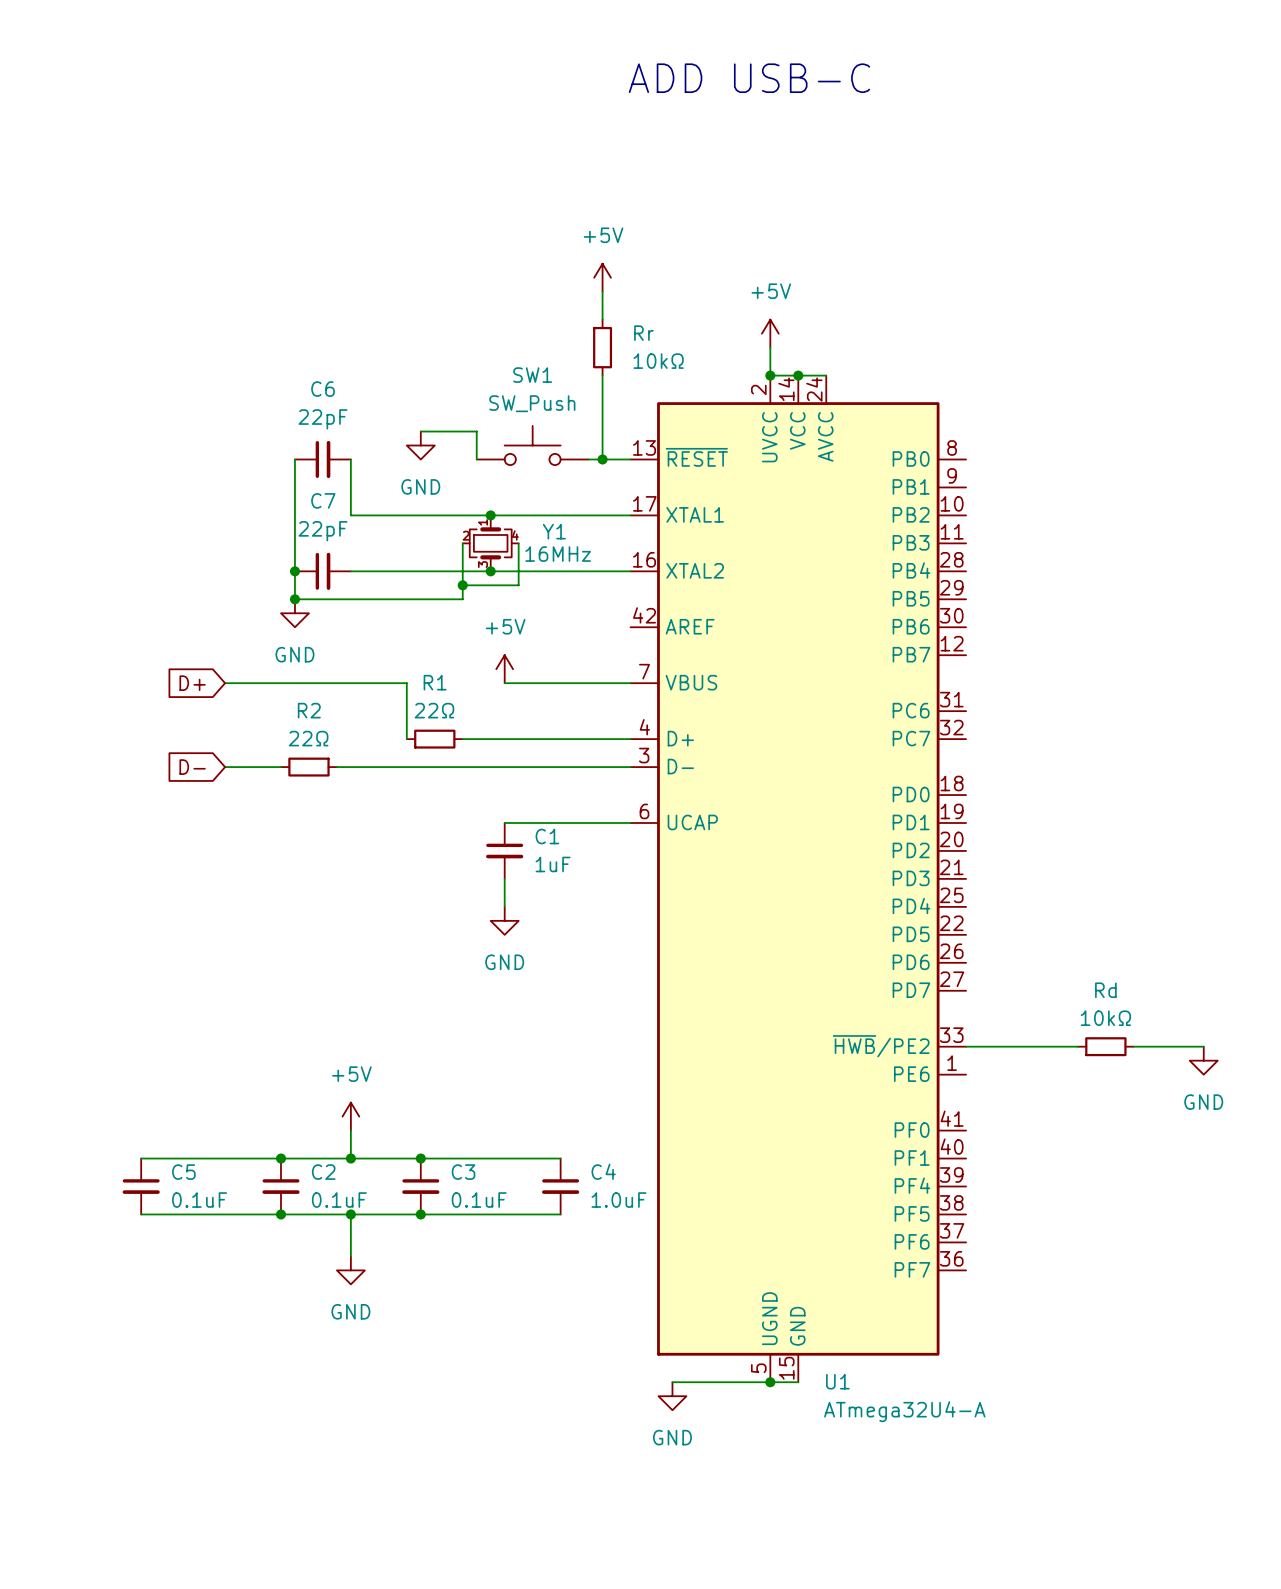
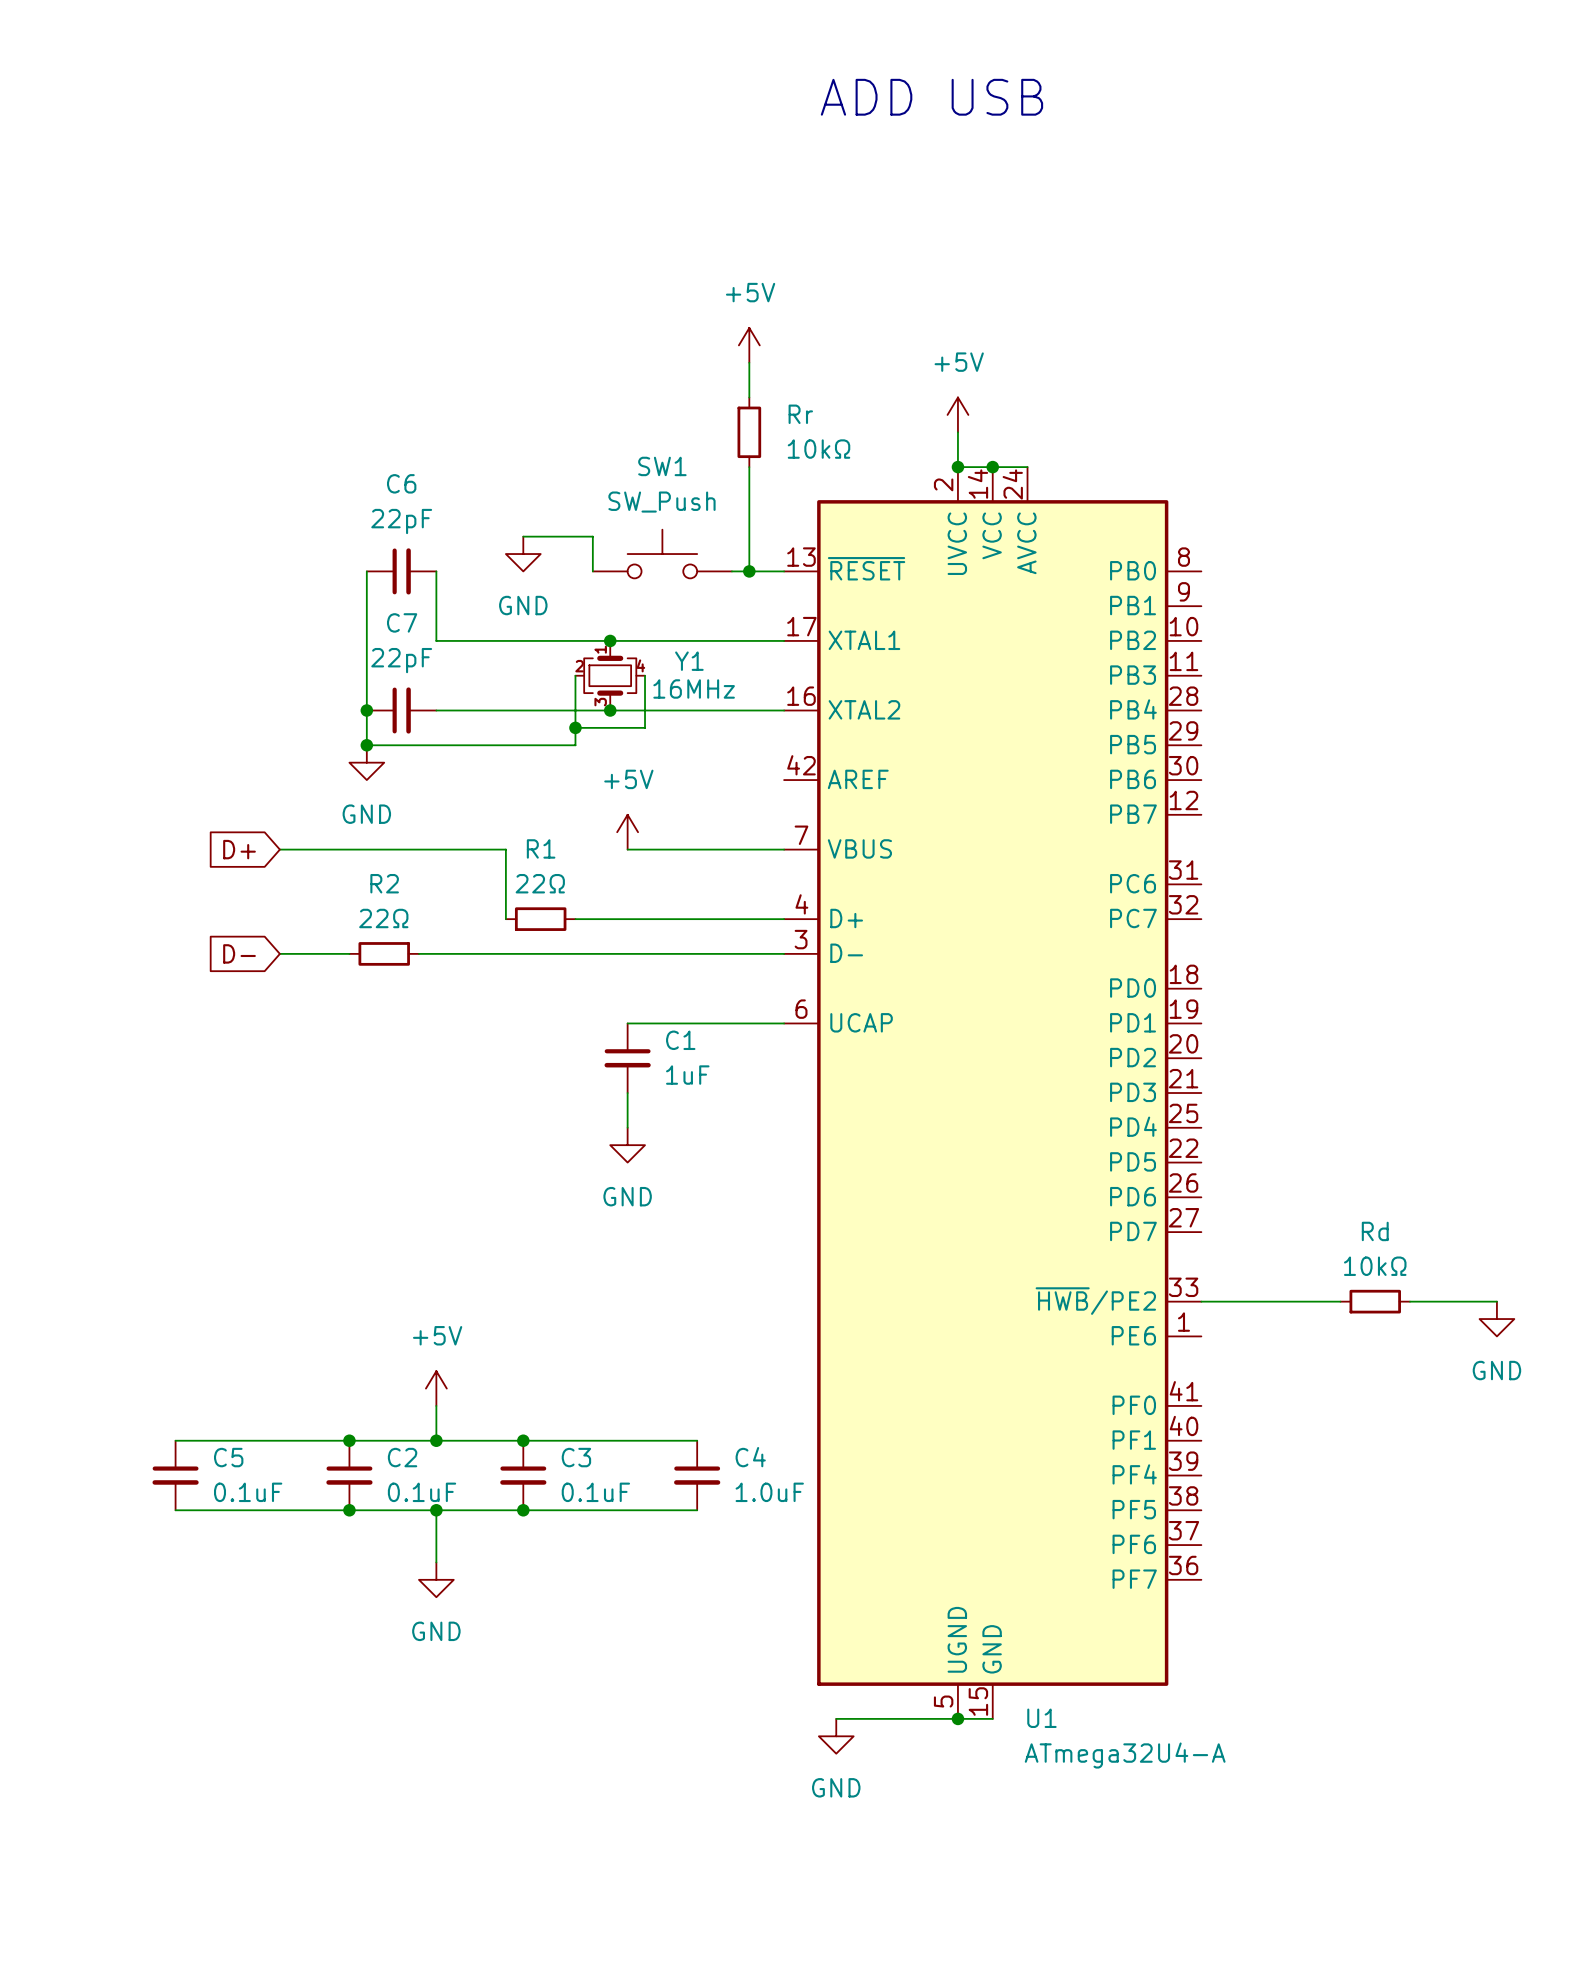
text: ADD USB-C (749, 78) -> ADD USB (931, 97)

